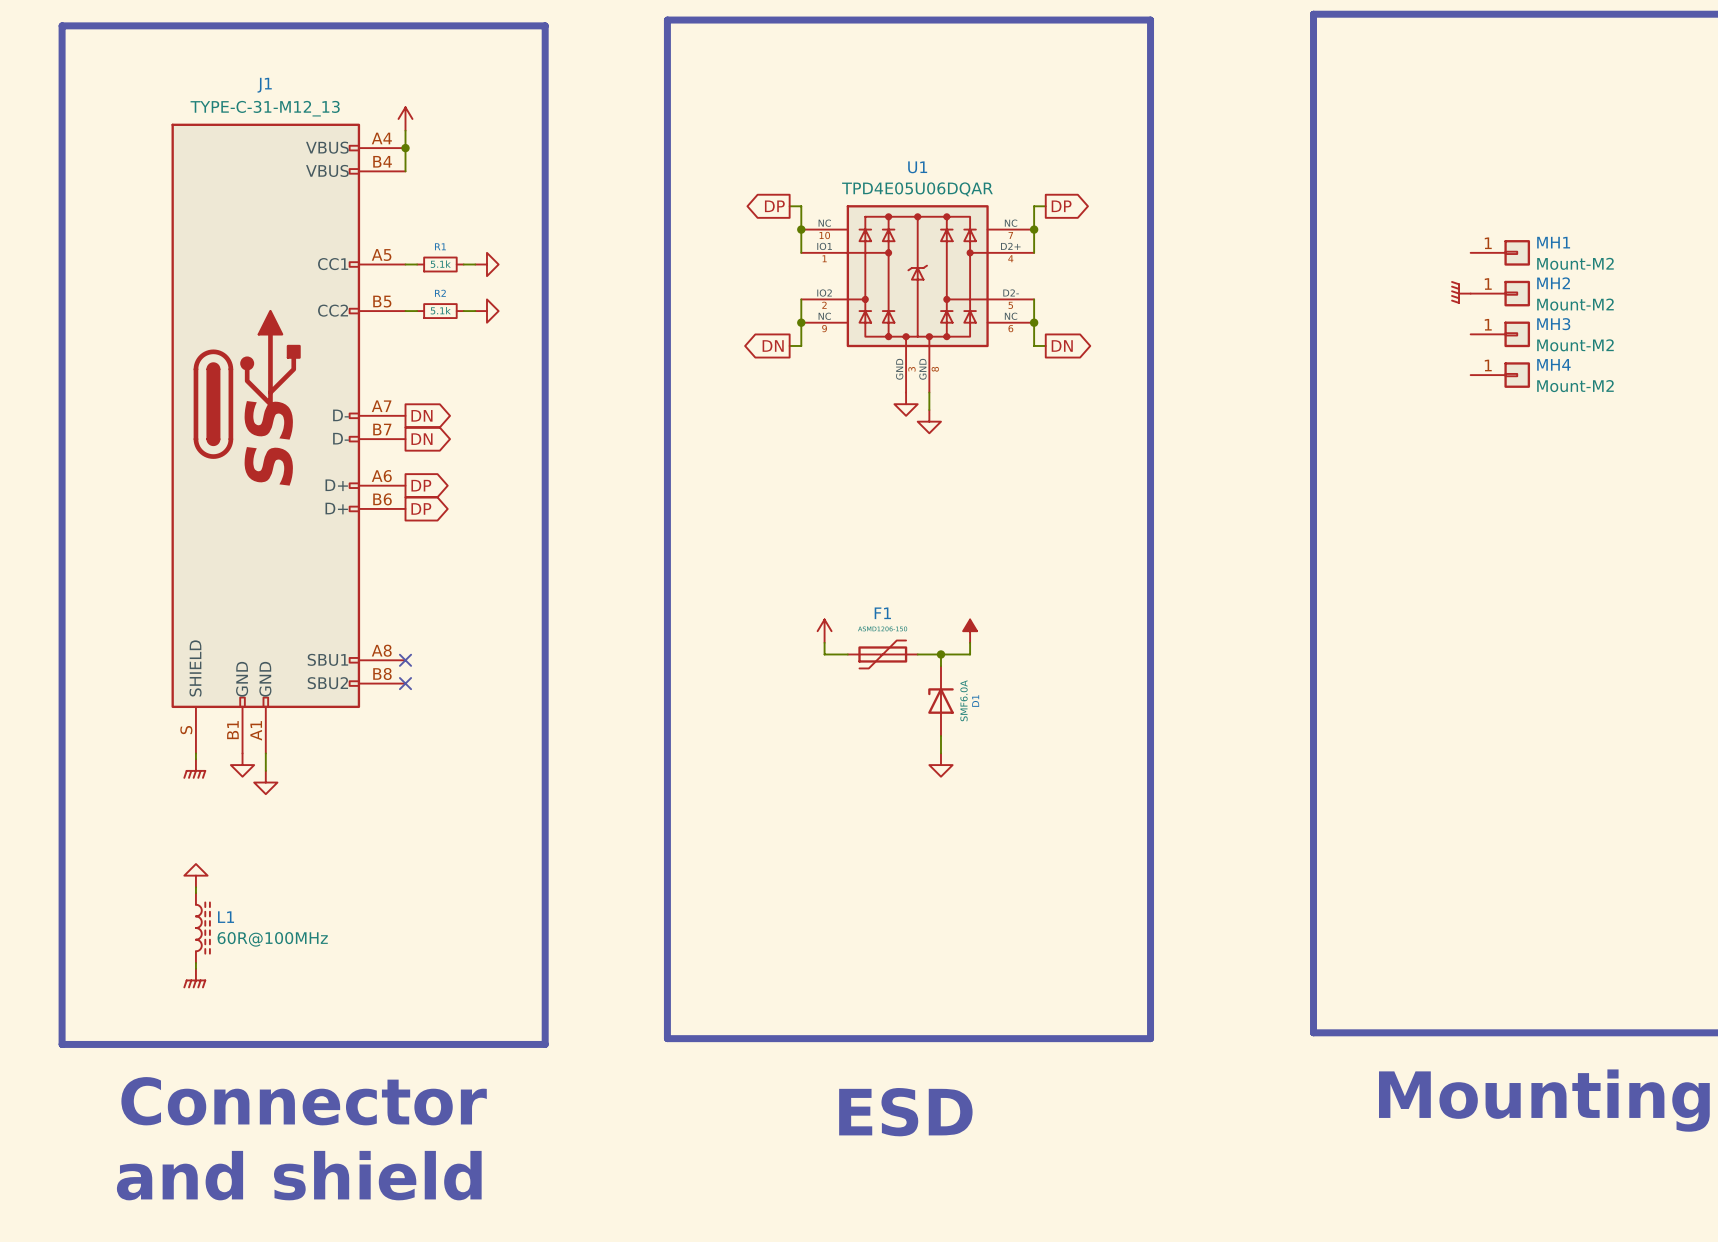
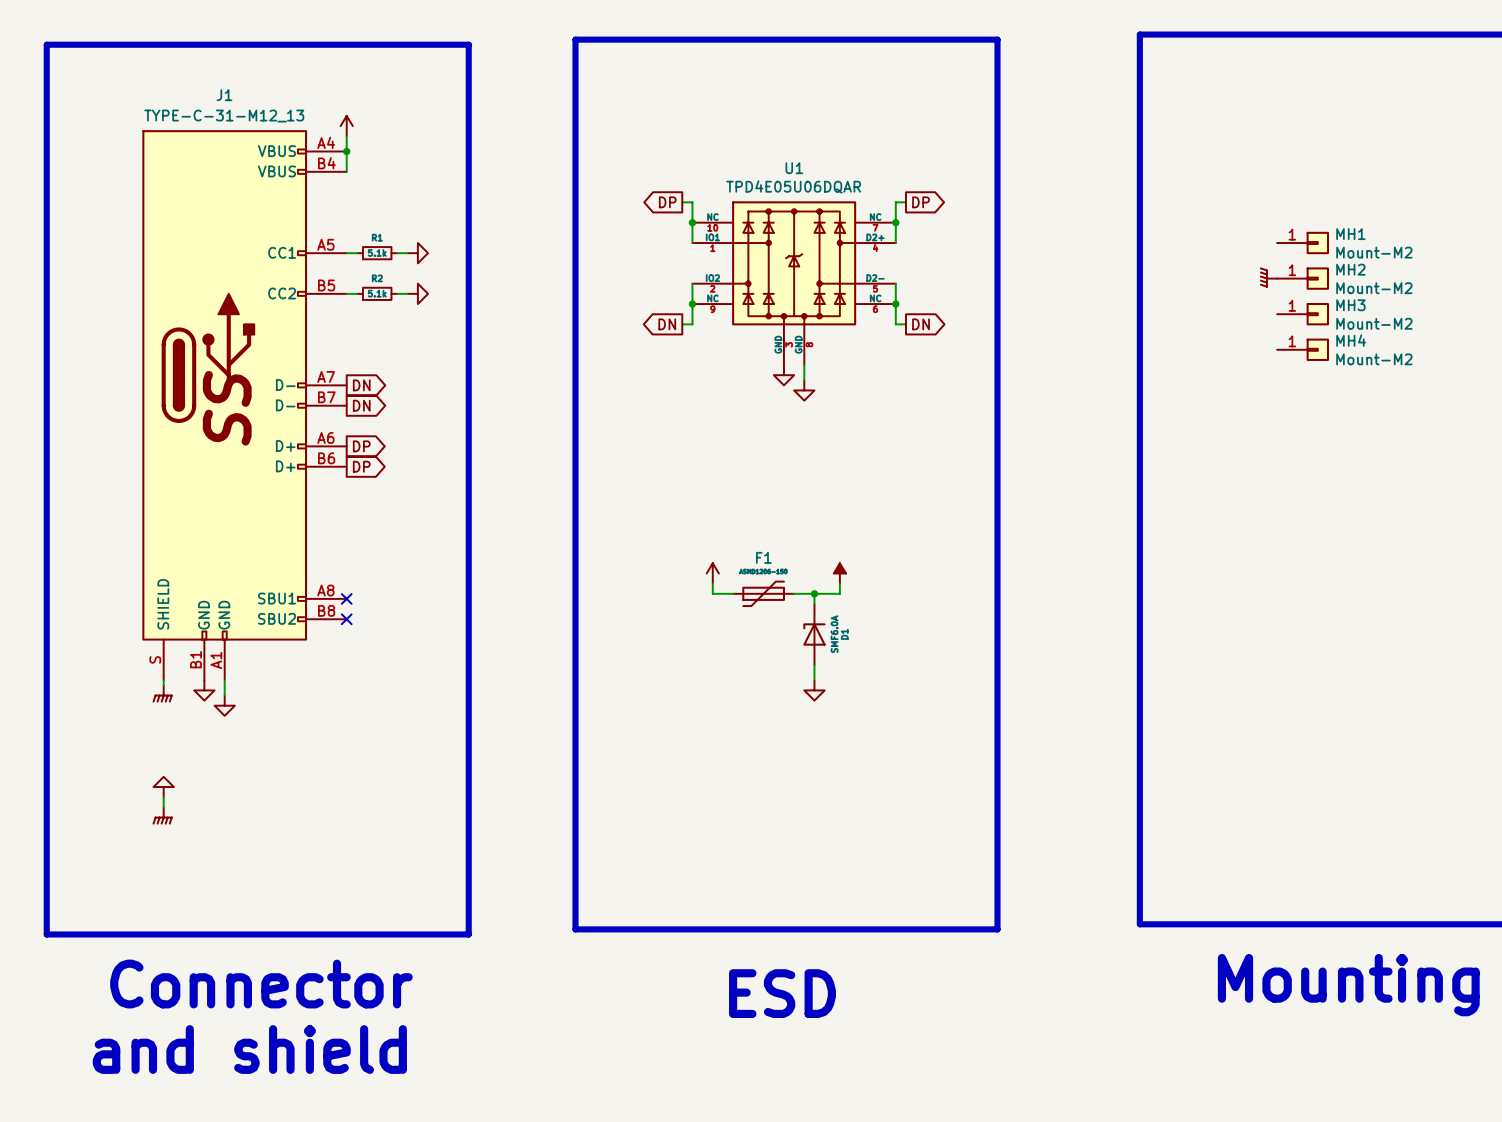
L1: 60R@100MHz (202, 928) -> none
power symbol position: (194, 978) -> (162, 815)

